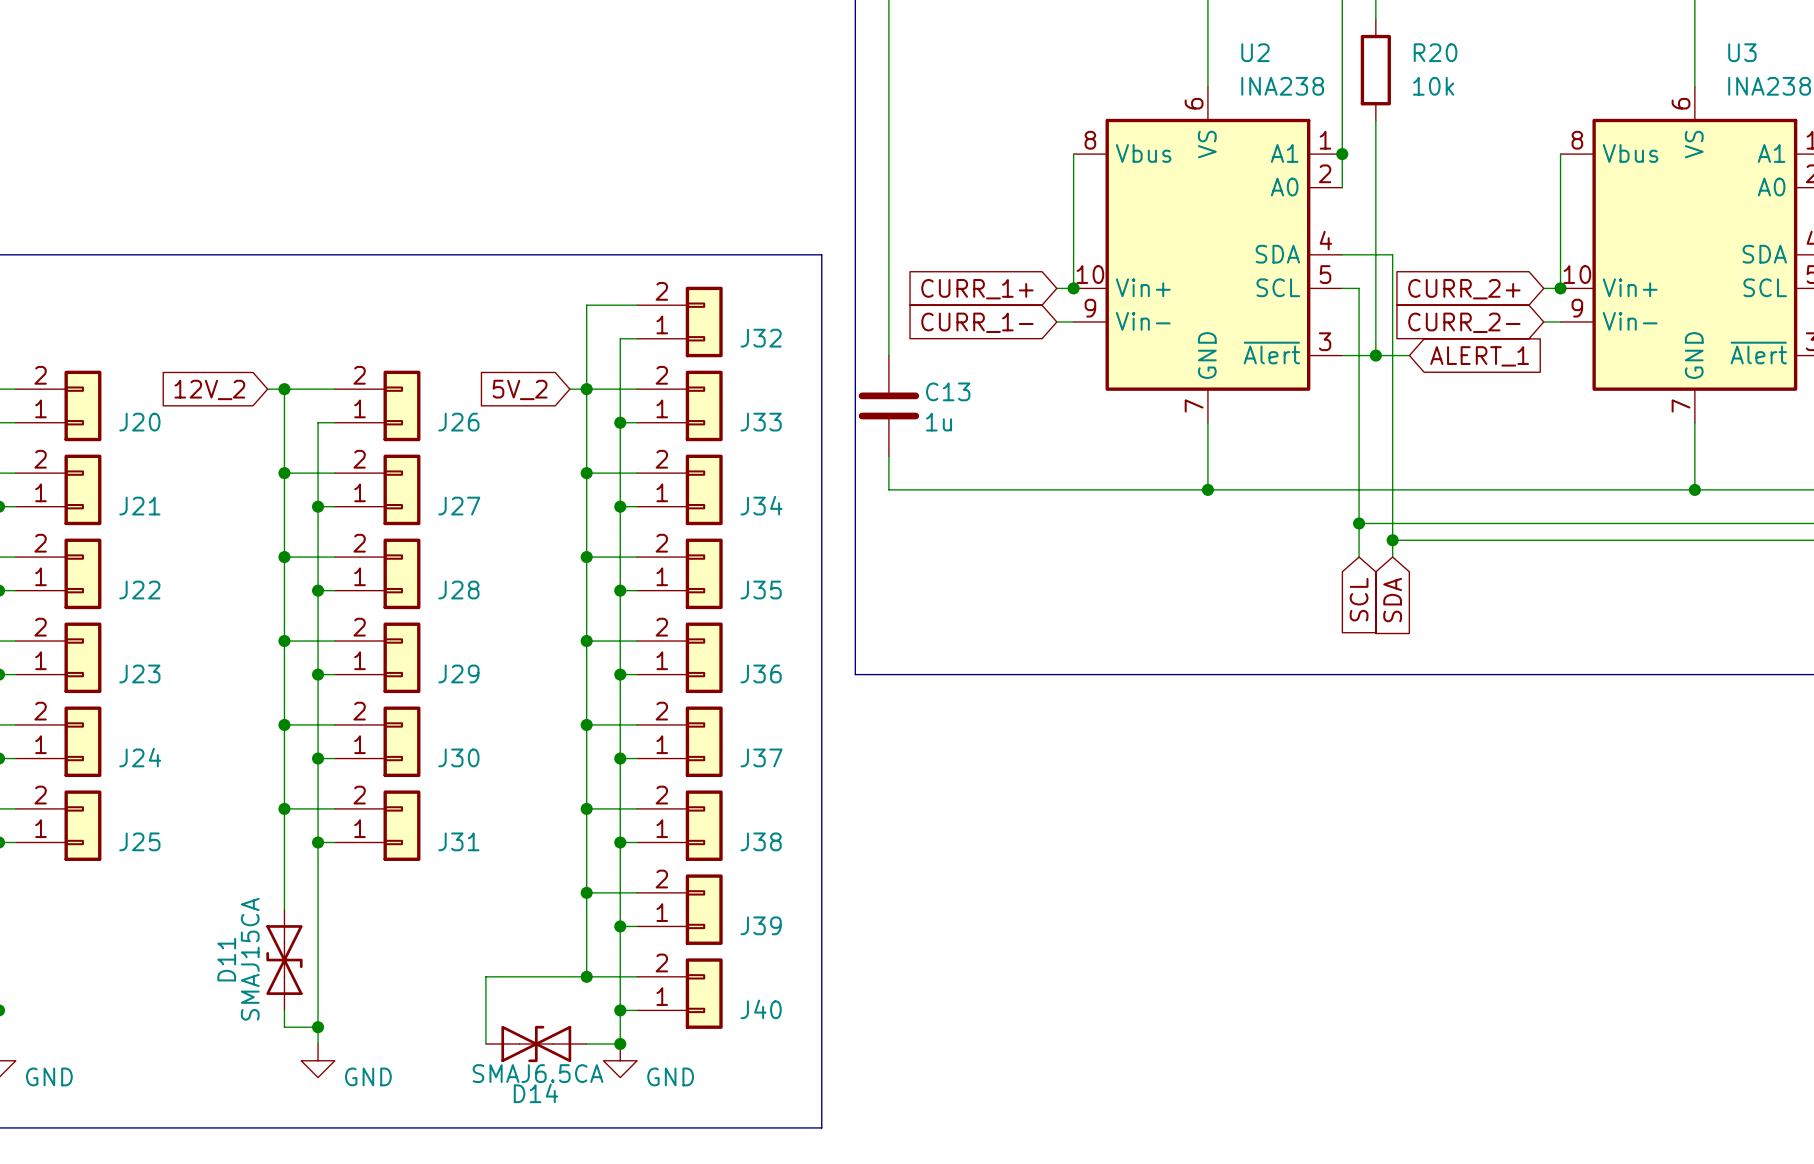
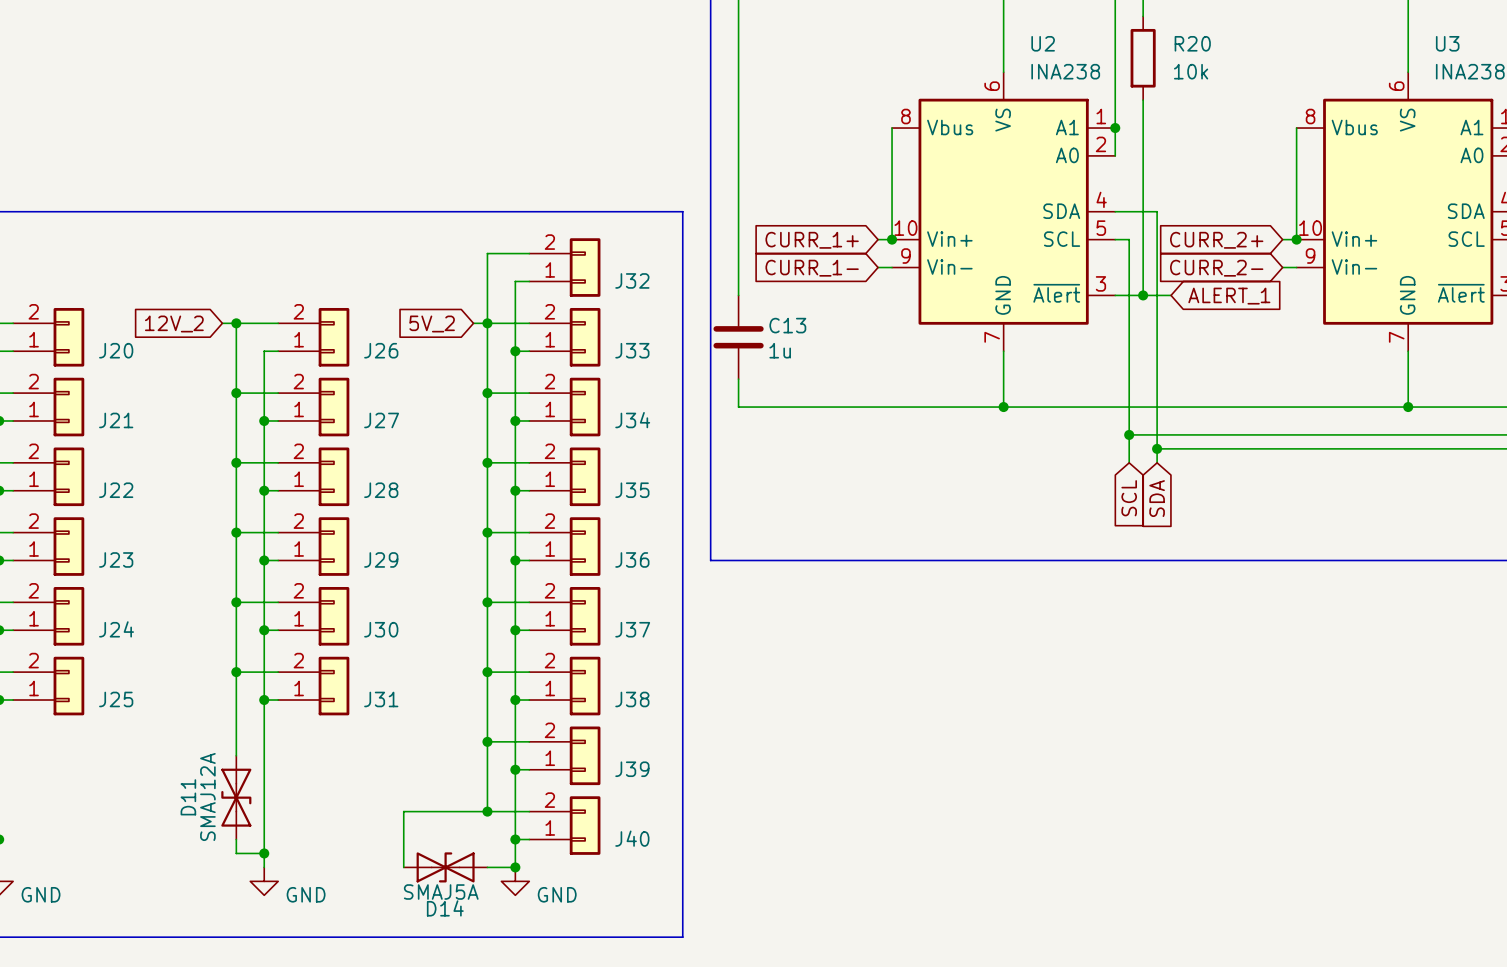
D11 value: SMAJ15CA (250, 959) -> SMAJ12A (207, 796)
D14 value: SMAJ6.5CA (538, 1073) -> SMAJ5A (441, 892)

